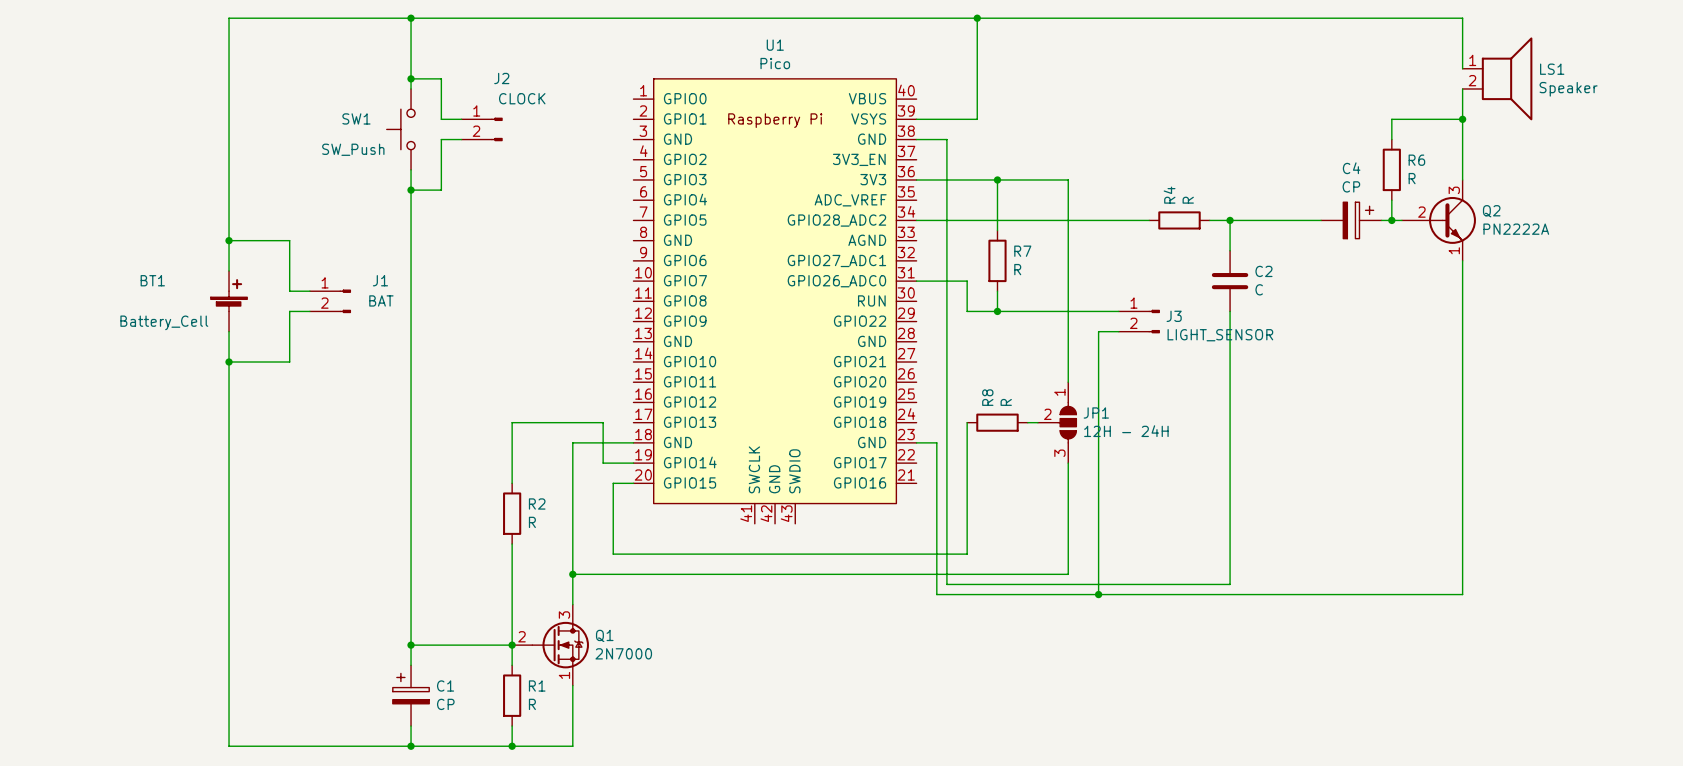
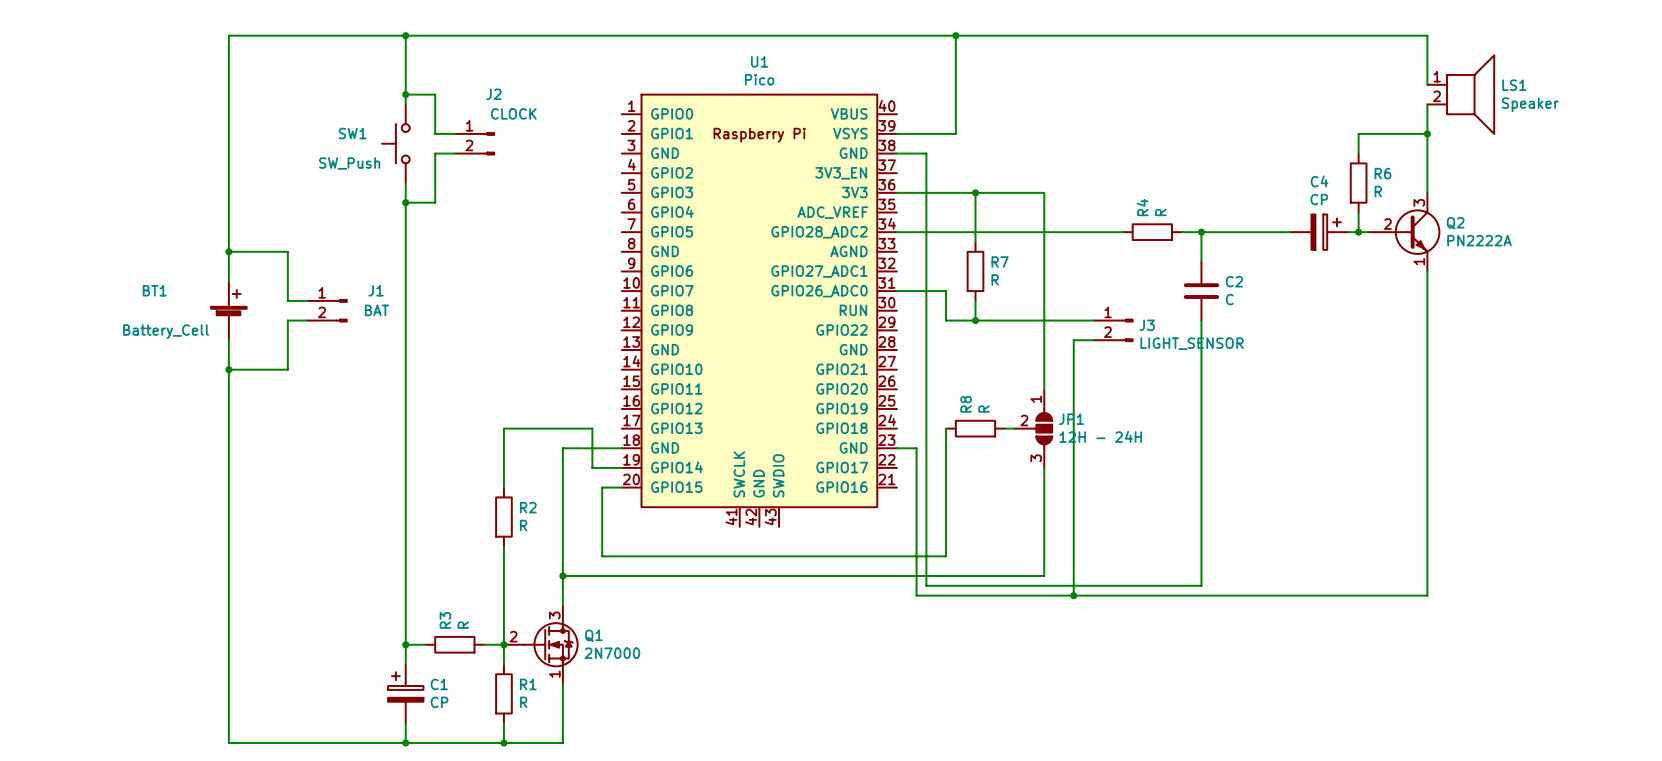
wire: (431, 645) (491, 645) -> none
R3: none -> R (454, 644)

